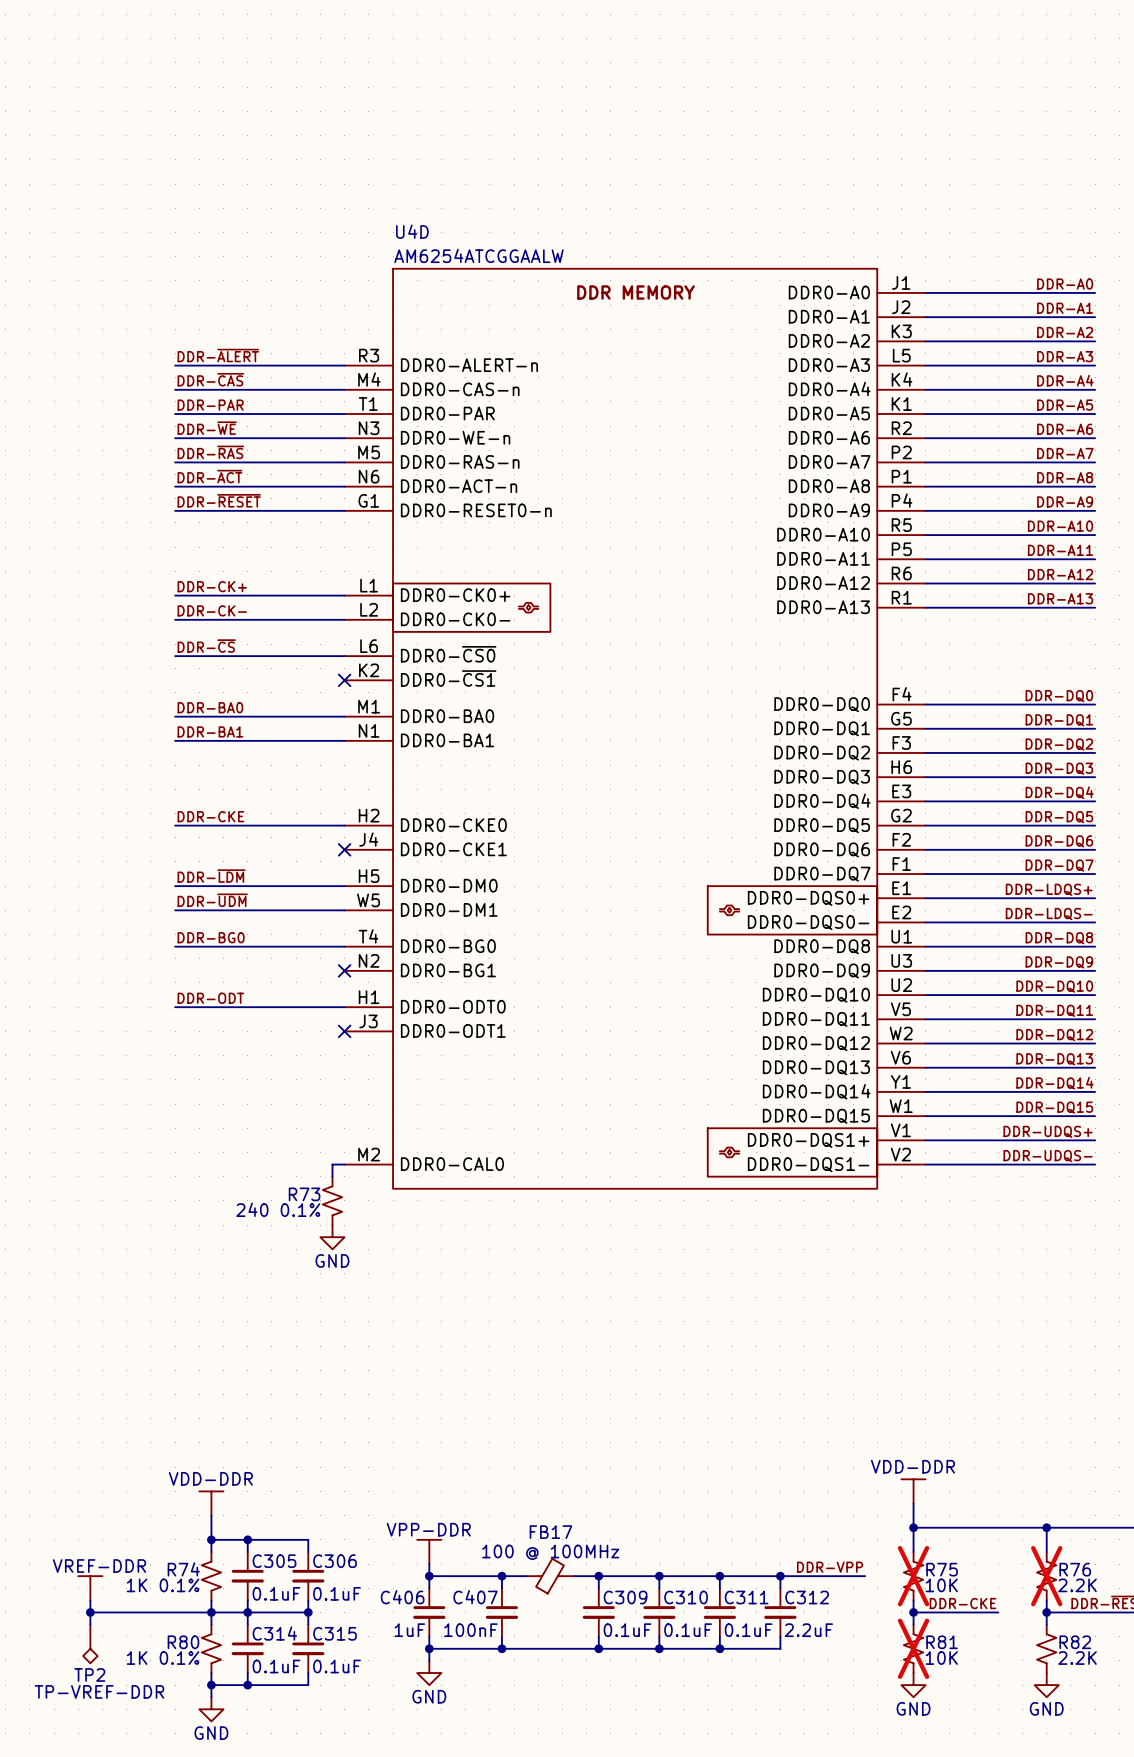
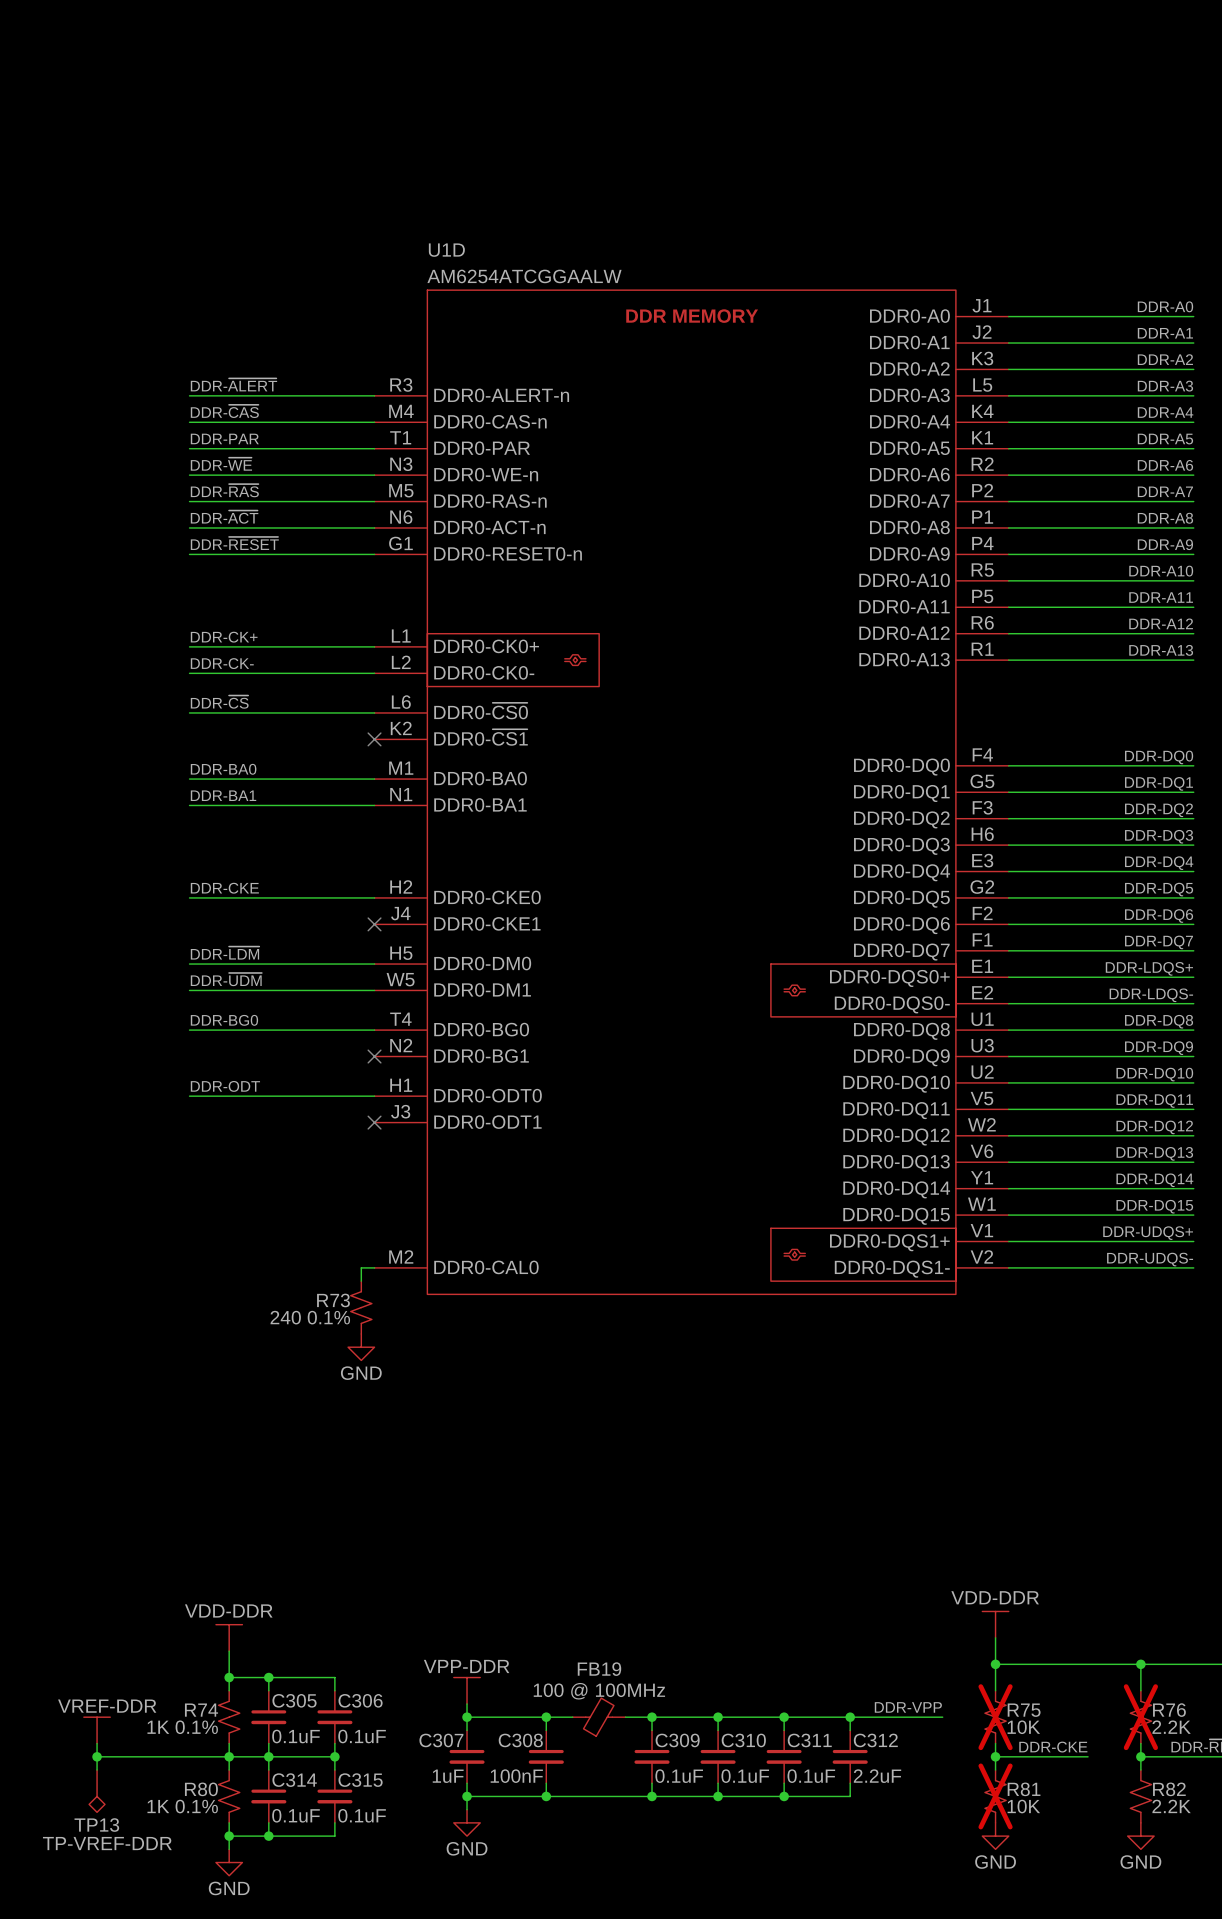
U4D name: U4D (412, 231) -> U1D (446, 250)
FB17 name: FB17 (550, 1532) -> FB19 (599, 1669)
C406 name: C406 (402, 1597) -> C307 (441, 1740)
C407 name: C407 (475, 1597) -> C308 (520, 1740)
TP2 name: TP2 (89, 1674) -> TP13 (96, 1825)

